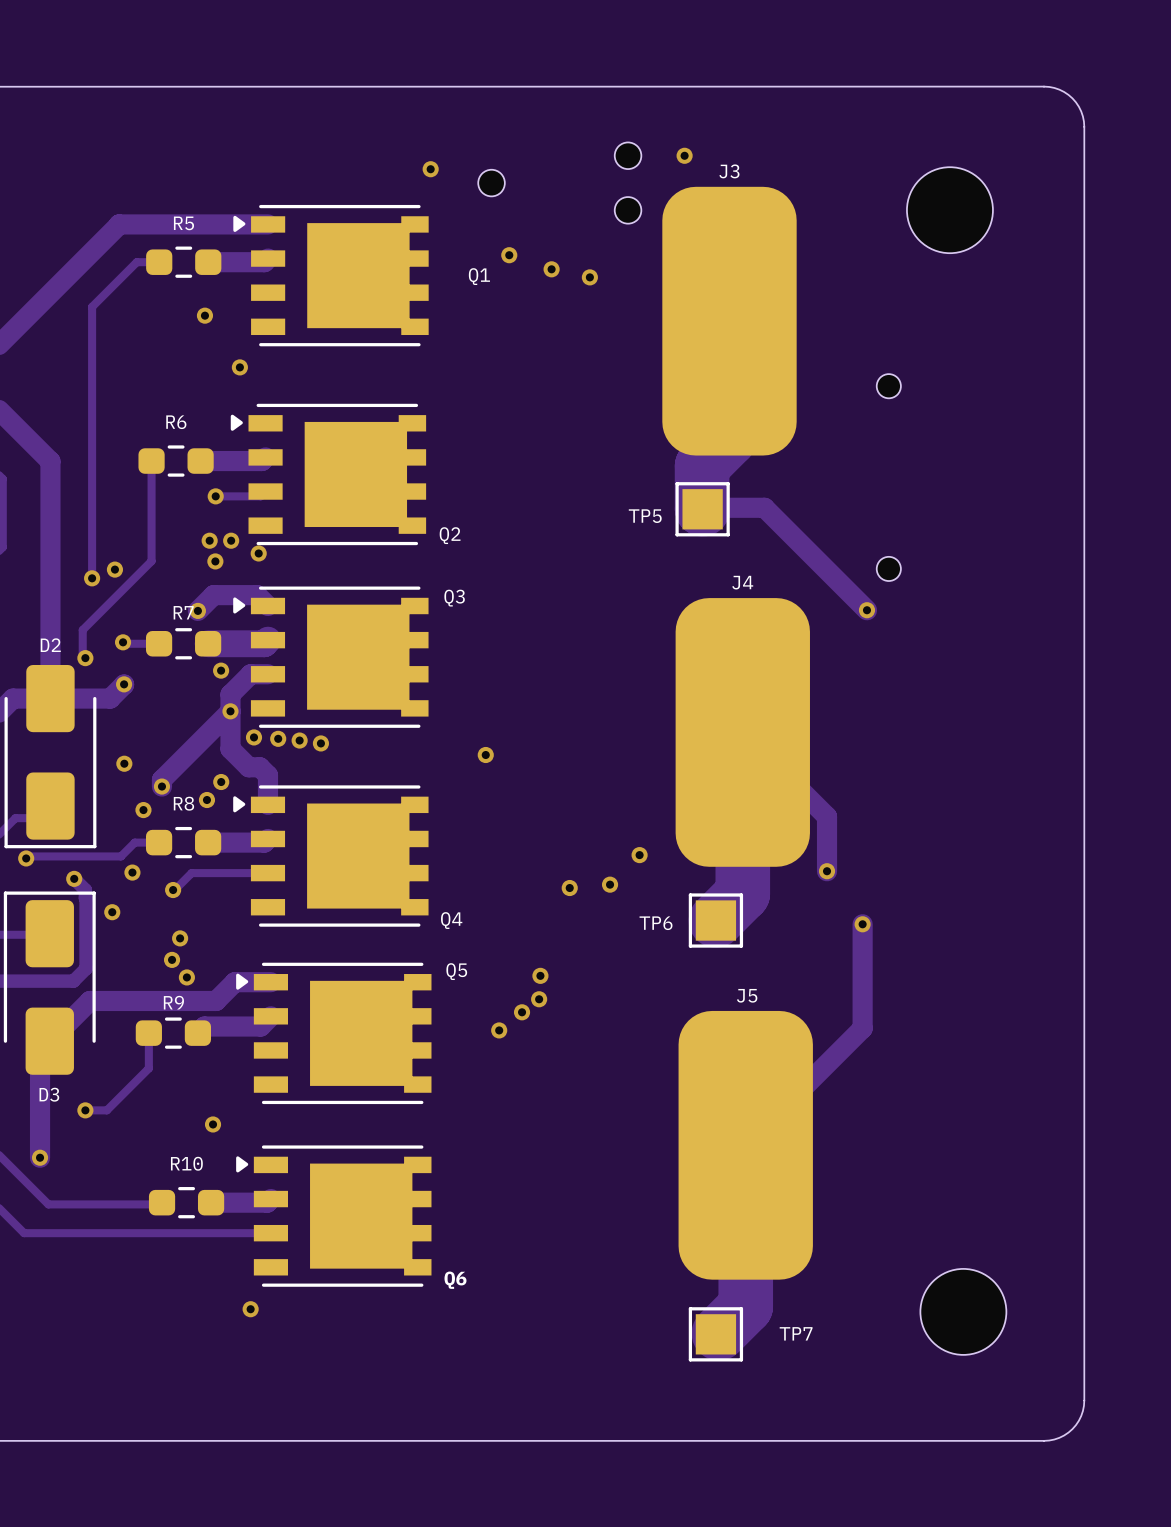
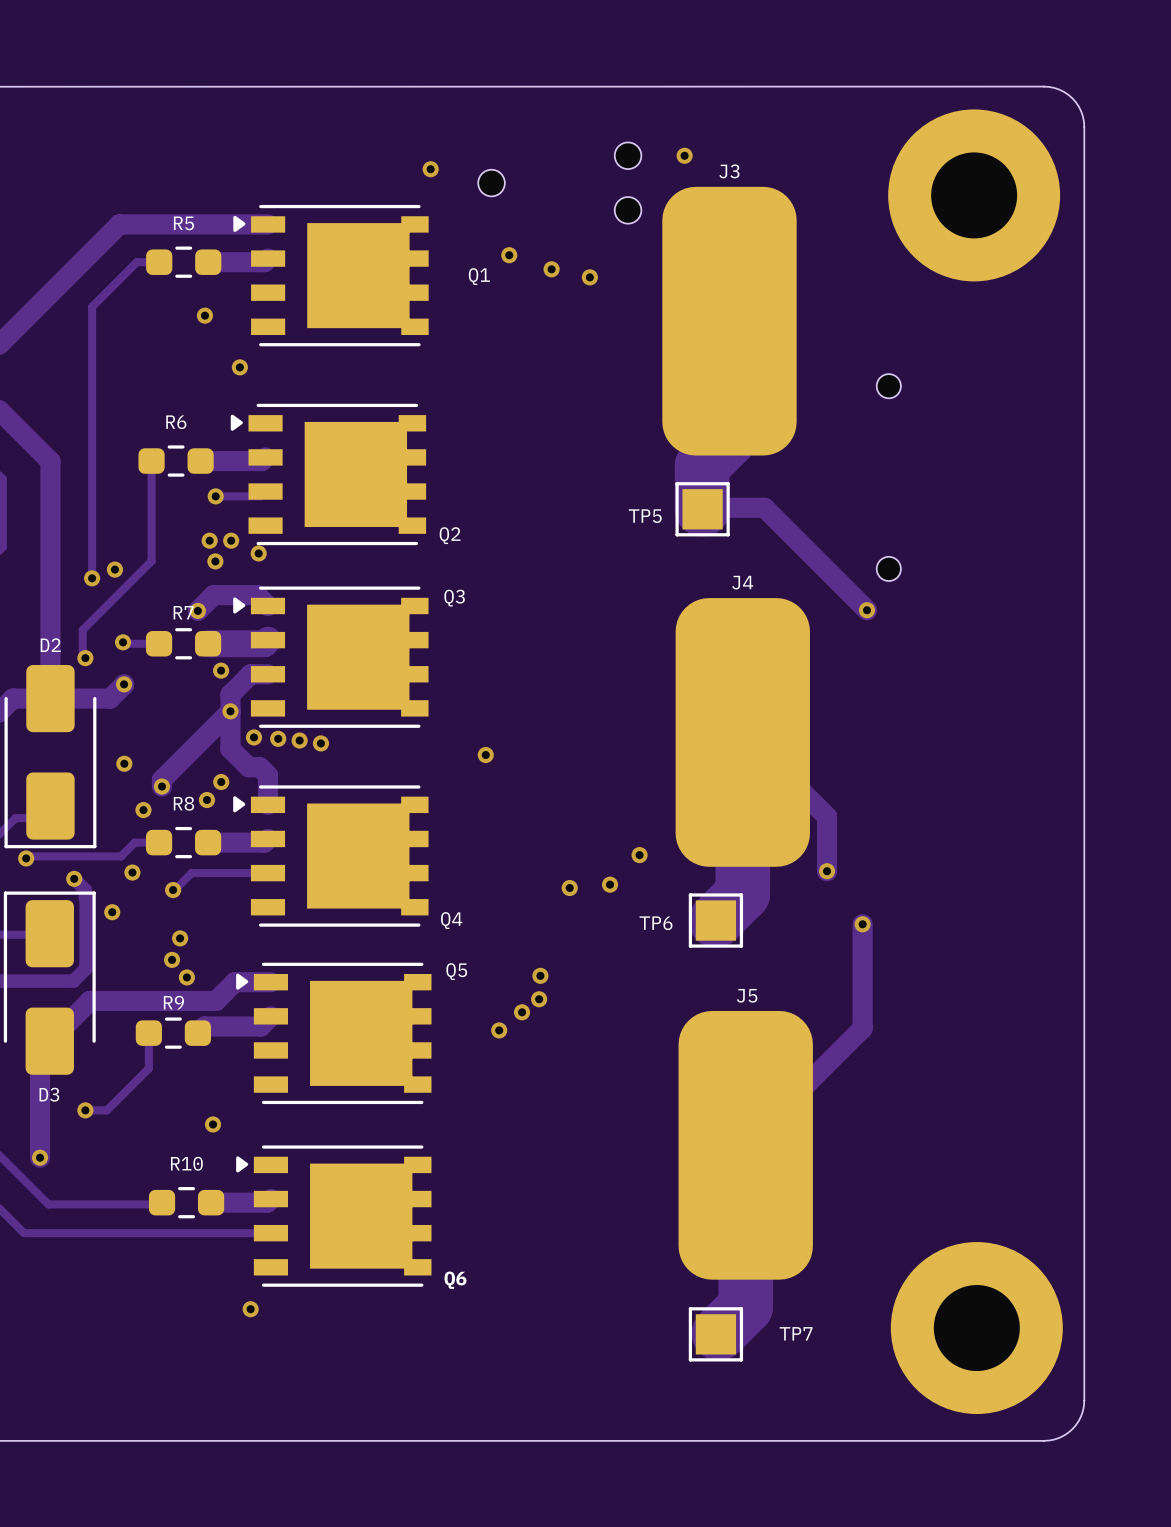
part: none -> (974, 195)
part: (949, 210) -> none
part footprint: [920, 1268, 1007, 1355] -> [890, 1242, 1063, 1415]

